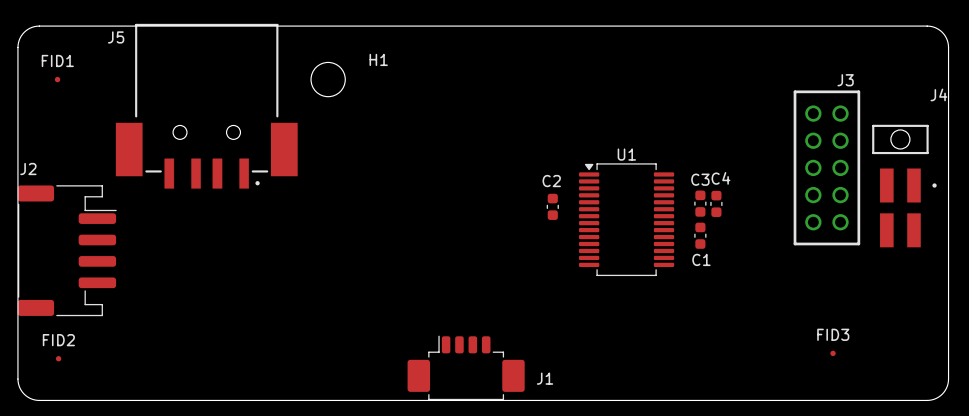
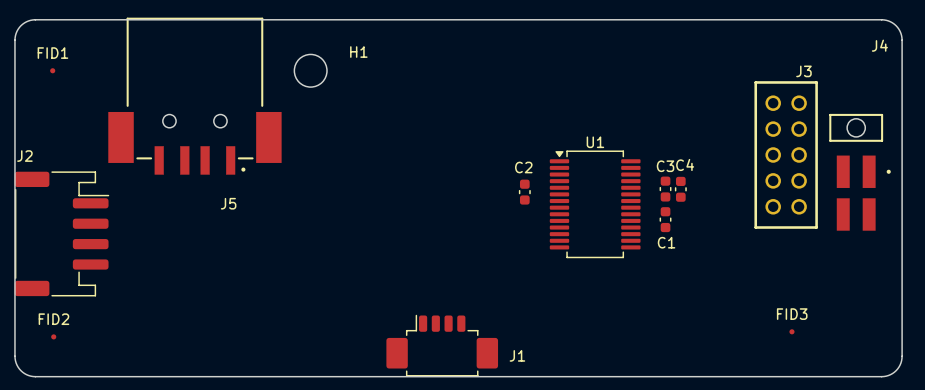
J5 name position: J5 (116, 37) -> J5 (228, 203)
J4 name position: J4 (938, 94) -> J4 (879, 45)

